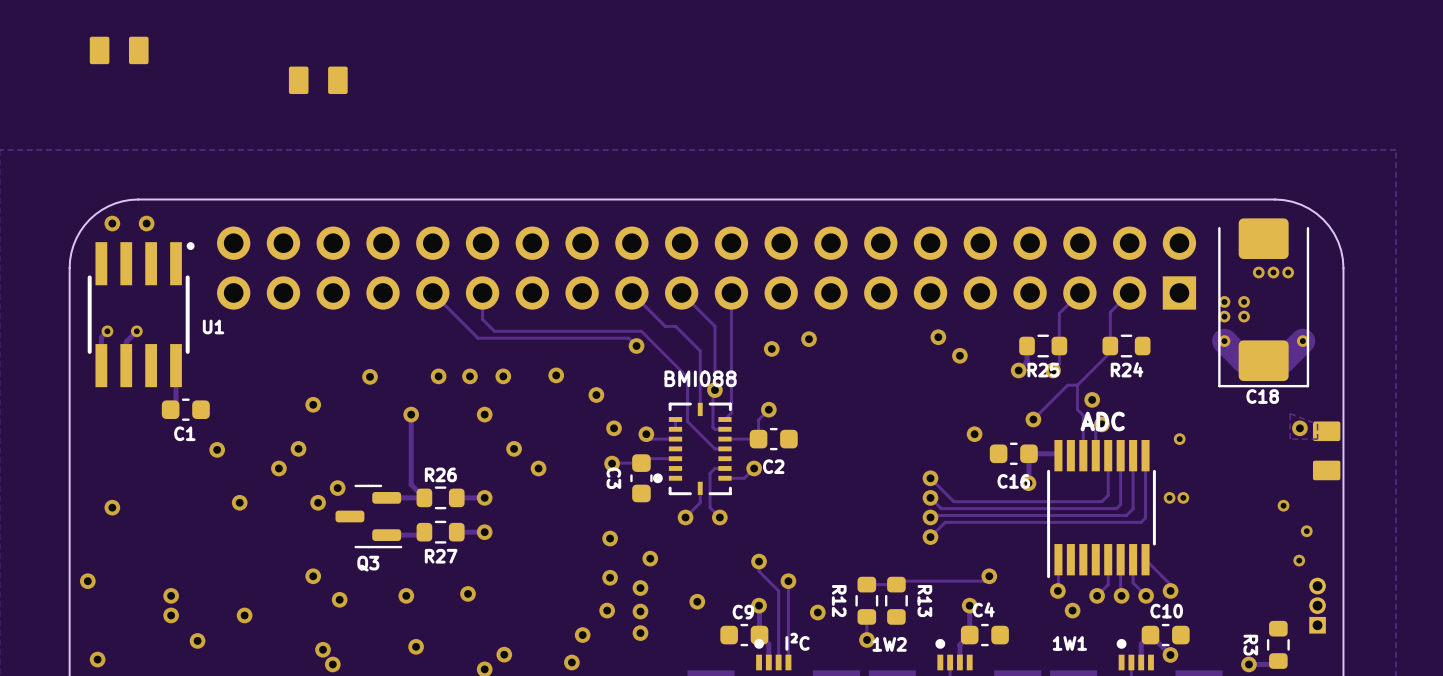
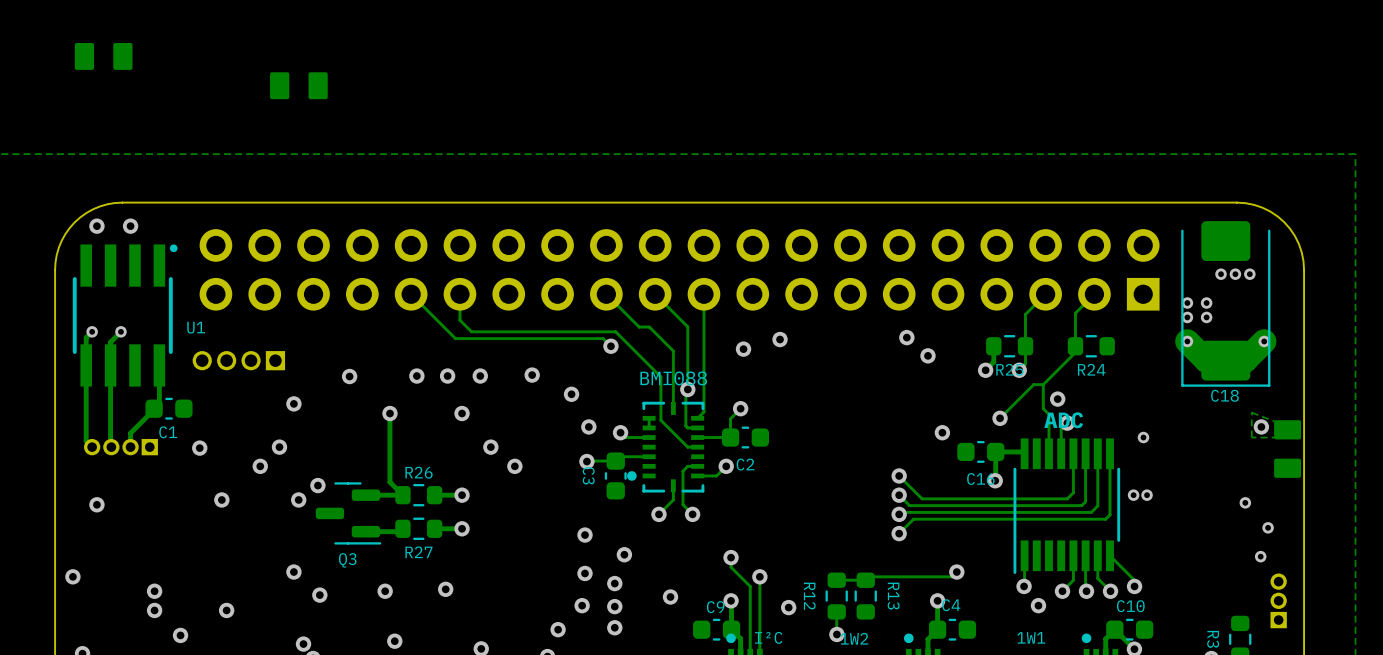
part: none -> (238, 360)
track: none -> (86, 365) (86, 441) (92, 447)
track: none -> (110, 365) (111, 447)
track: none -> (159, 404) (130, 433) (130, 447)
part: none -> (120, 447)

